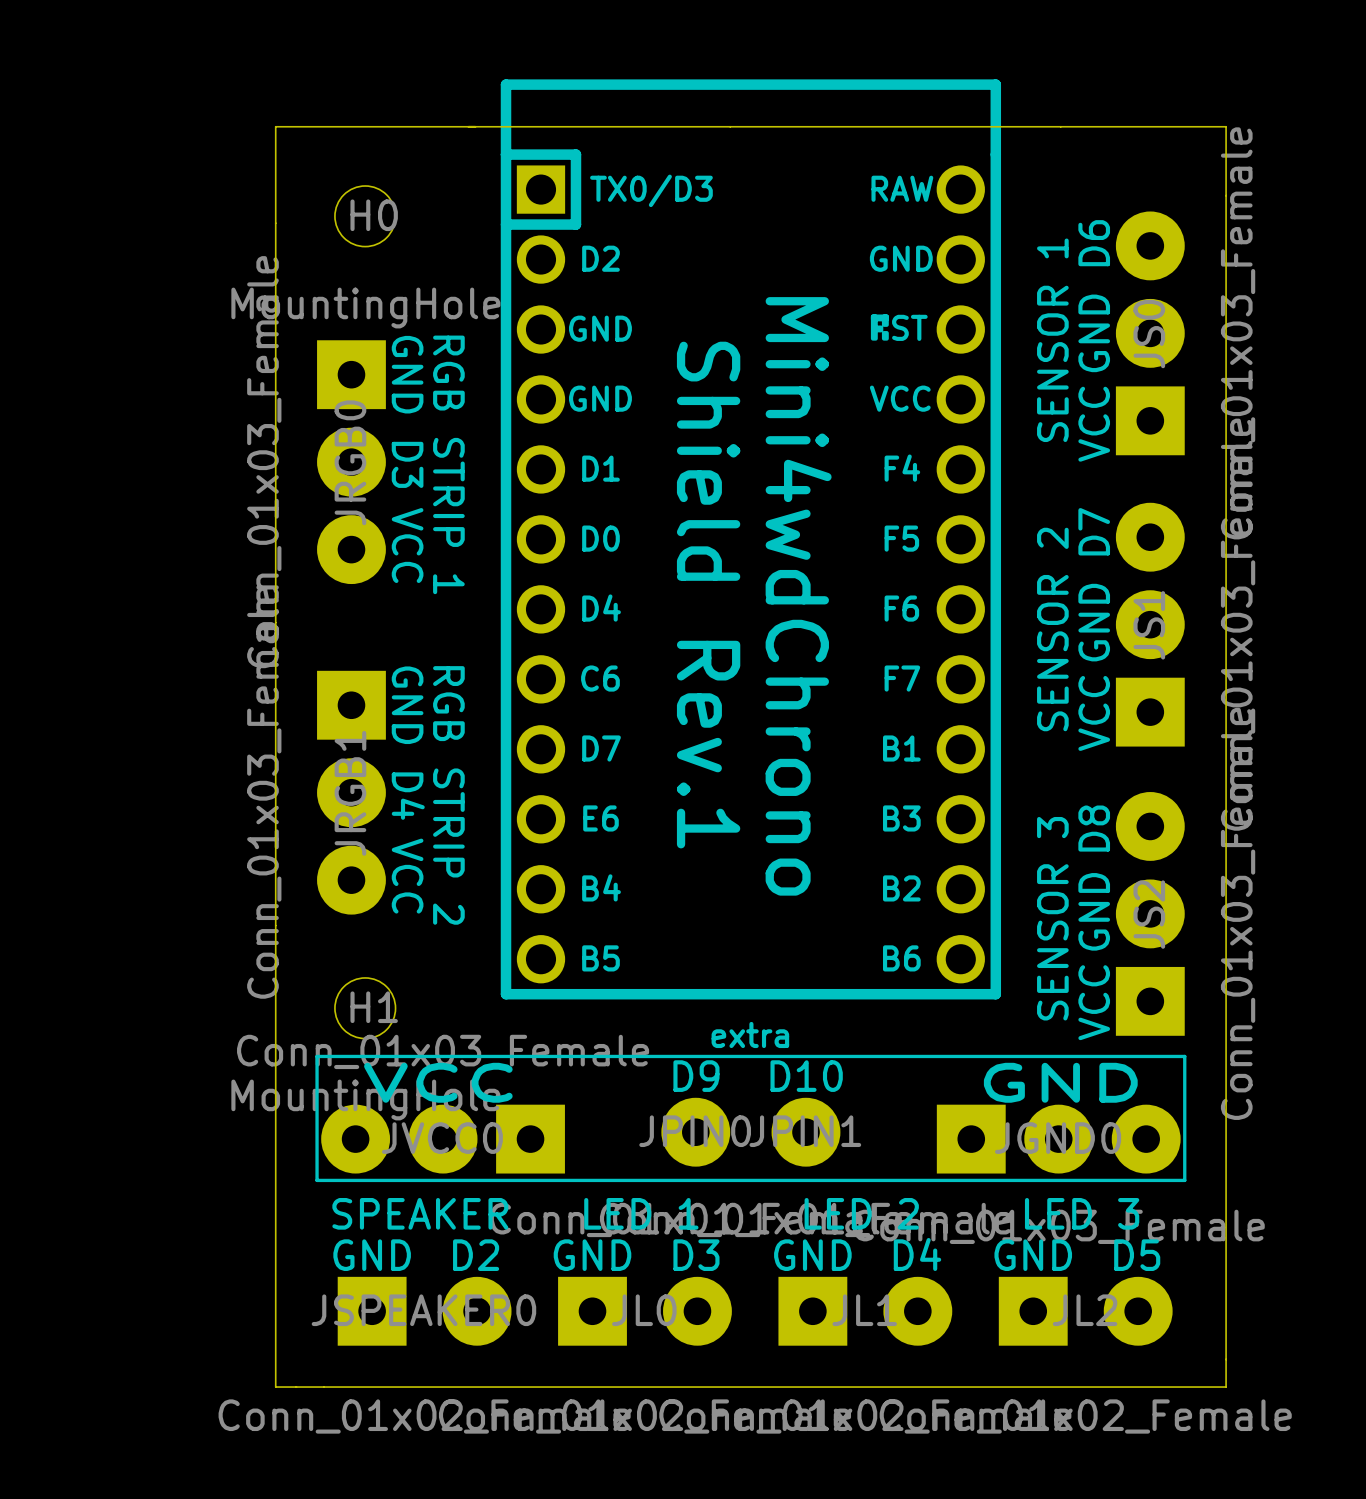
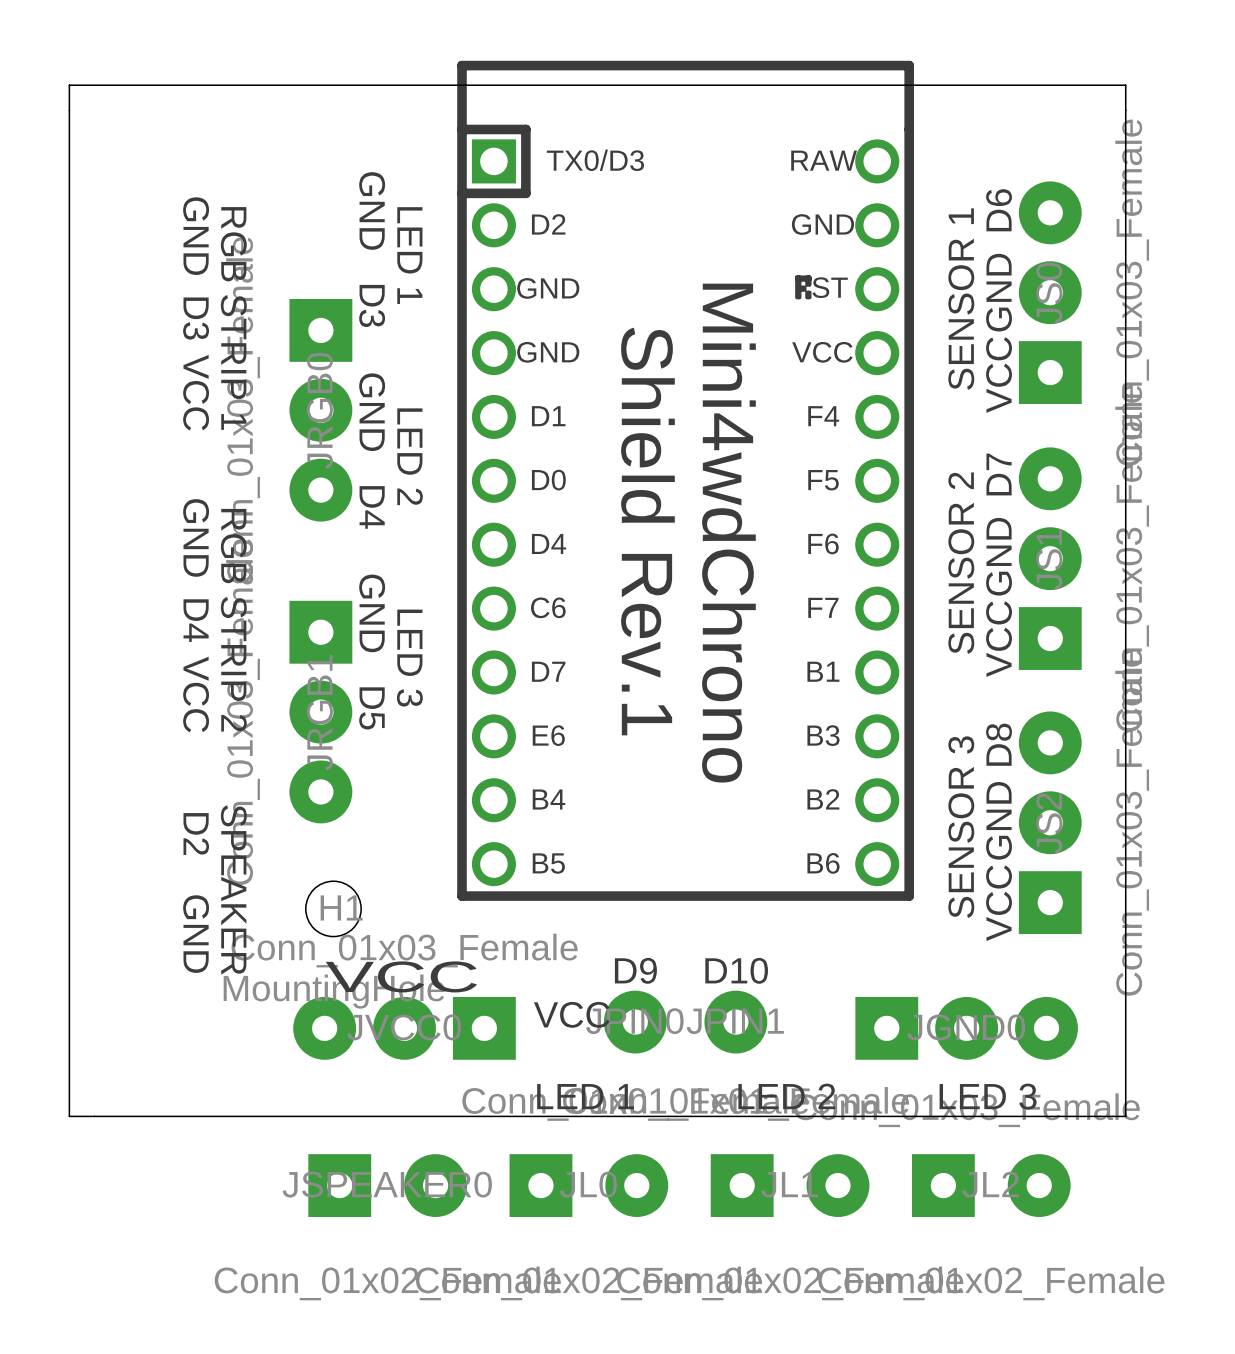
board edge: (275, 126) (275, 1387) (1226, 1387) (1226, 126) (275, 126) -> (69, 85) (69, 1116) (1125, 1116) (1125, 85) (69, 85)
H0: MountingHole (365, 216) -> none
text: none -> GND (372, 211)
text: none -> GND (196, 236)
text: none -> LED 1 (409, 255)
text: none -> D3 (196, 318)
text: GND (407, 374) -> D3 (372, 305)
text: none -> VCC (196, 392)
text: D3 (407, 464) -> GND (372, 412)
text position: RGB STRIP 1 (448, 464) -> RGB STRIP 1 (233, 318)
text: none -> LED 2 (410, 456)
text: VCC (407, 545) -> D4 (372, 507)
text: none -> GND (196, 537)
text: none -> D4 (196, 620)
text position: GND (407, 705) -> GND (372, 613)
text: none -> LED 3 (409, 658)
text: none -> VCC (196, 694)
text position: RGB STRIP 2 (448, 795) -> RGB STRIP 2 (233, 620)
text: D4 (408, 796) -> D5 (371, 708)
text: VCC (407, 876) -> none
text: extra (750, 1034) -> none
text: none -> GND (196, 934)
line: (317, 1056) (317, 1180) (1184, 1180) (1184, 1056) (317, 1056) -> none
text: GND (1060, 1082) -> none
text: none -> VCC (571, 1014)
text rotation: 0° (420, 1213) -> 90° clockwise (233, 890)
text position: SPEAKER (420, 1213) -> SPEAKER (233, 890)
text: D4 (917, 1254) -> none
text: GND (372, 1255) -> none
text rotation: 0° (476, 1255) -> 90° clockwise (196, 834)
text position: D2 (476, 1255) -> D2 (196, 834)
text: GND (592, 1255) -> none
text: D3 (696, 1255) -> none
text: GND (812, 1255) -> none
text: GND (1033, 1255) -> none
text: D5 (1137, 1255) -> none

